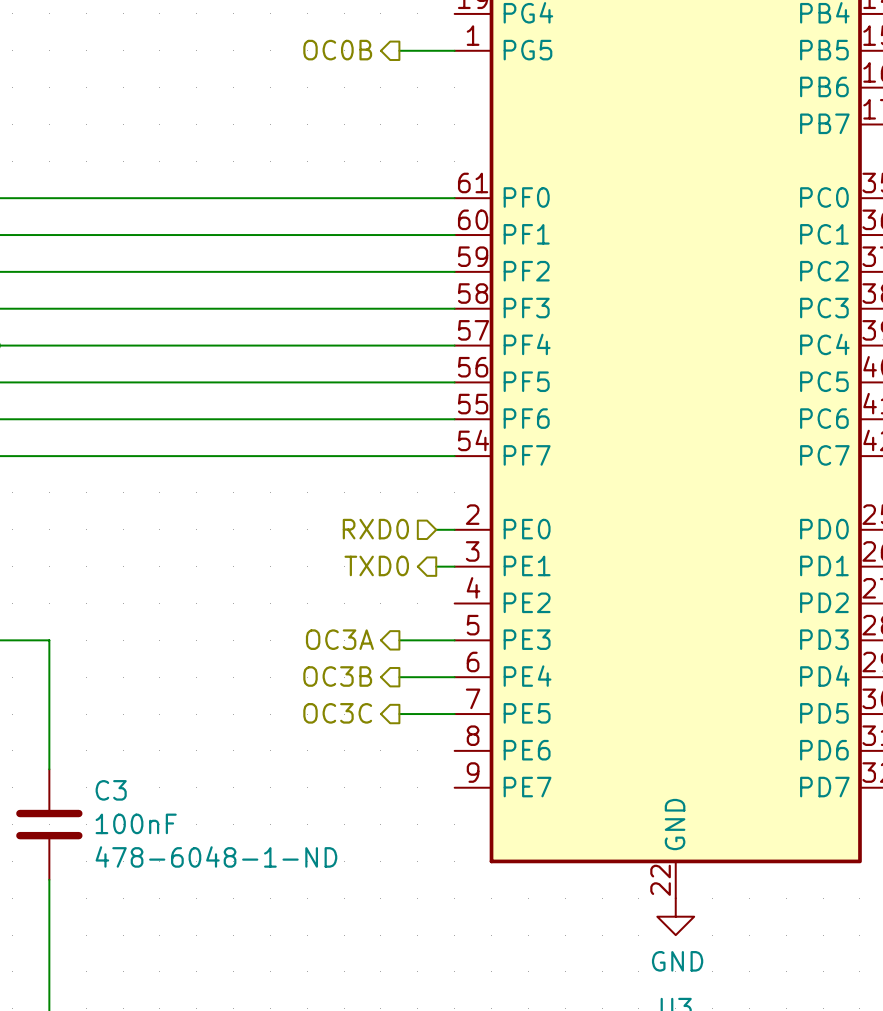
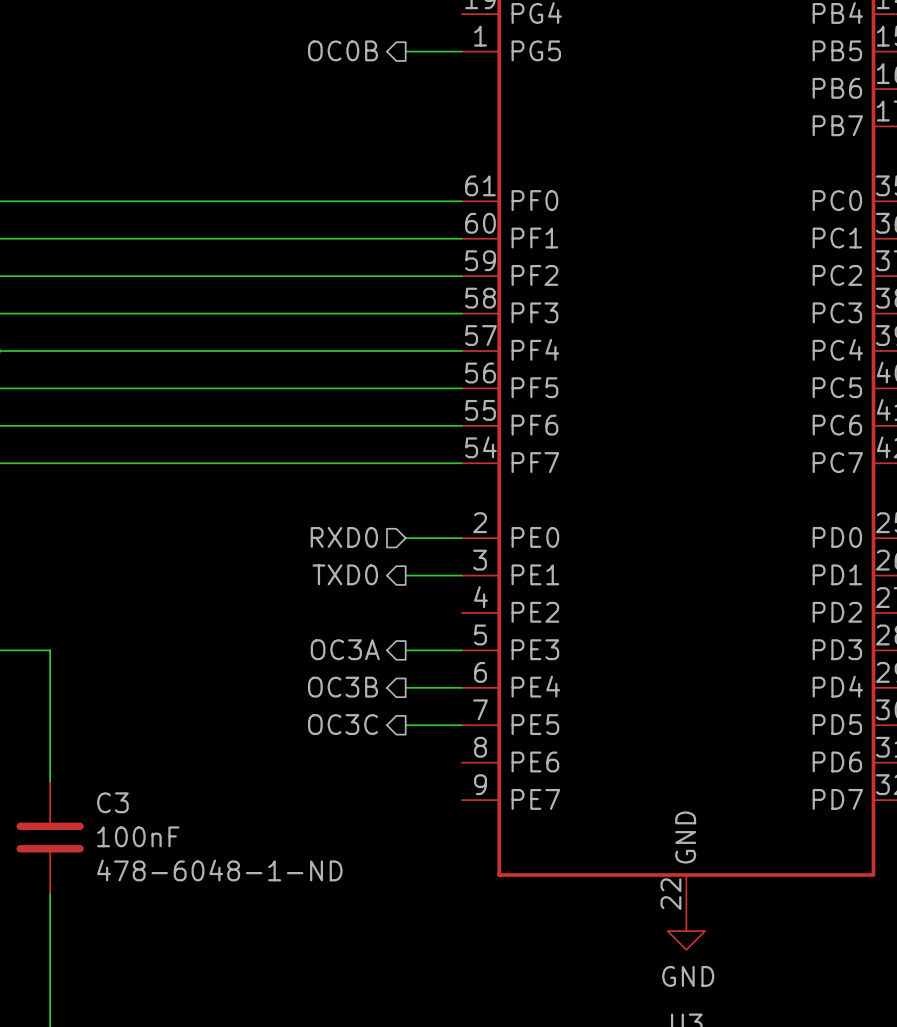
hierarchical label position: RXD0 (375, 529) -> RXD0 (344, 537)
wire: none -> (405, 538) (443, 538)
hierarchical label position: TXD0 (376, 565) -> TXD0 (345, 574)
wire: none -> (405, 575) (443, 575)

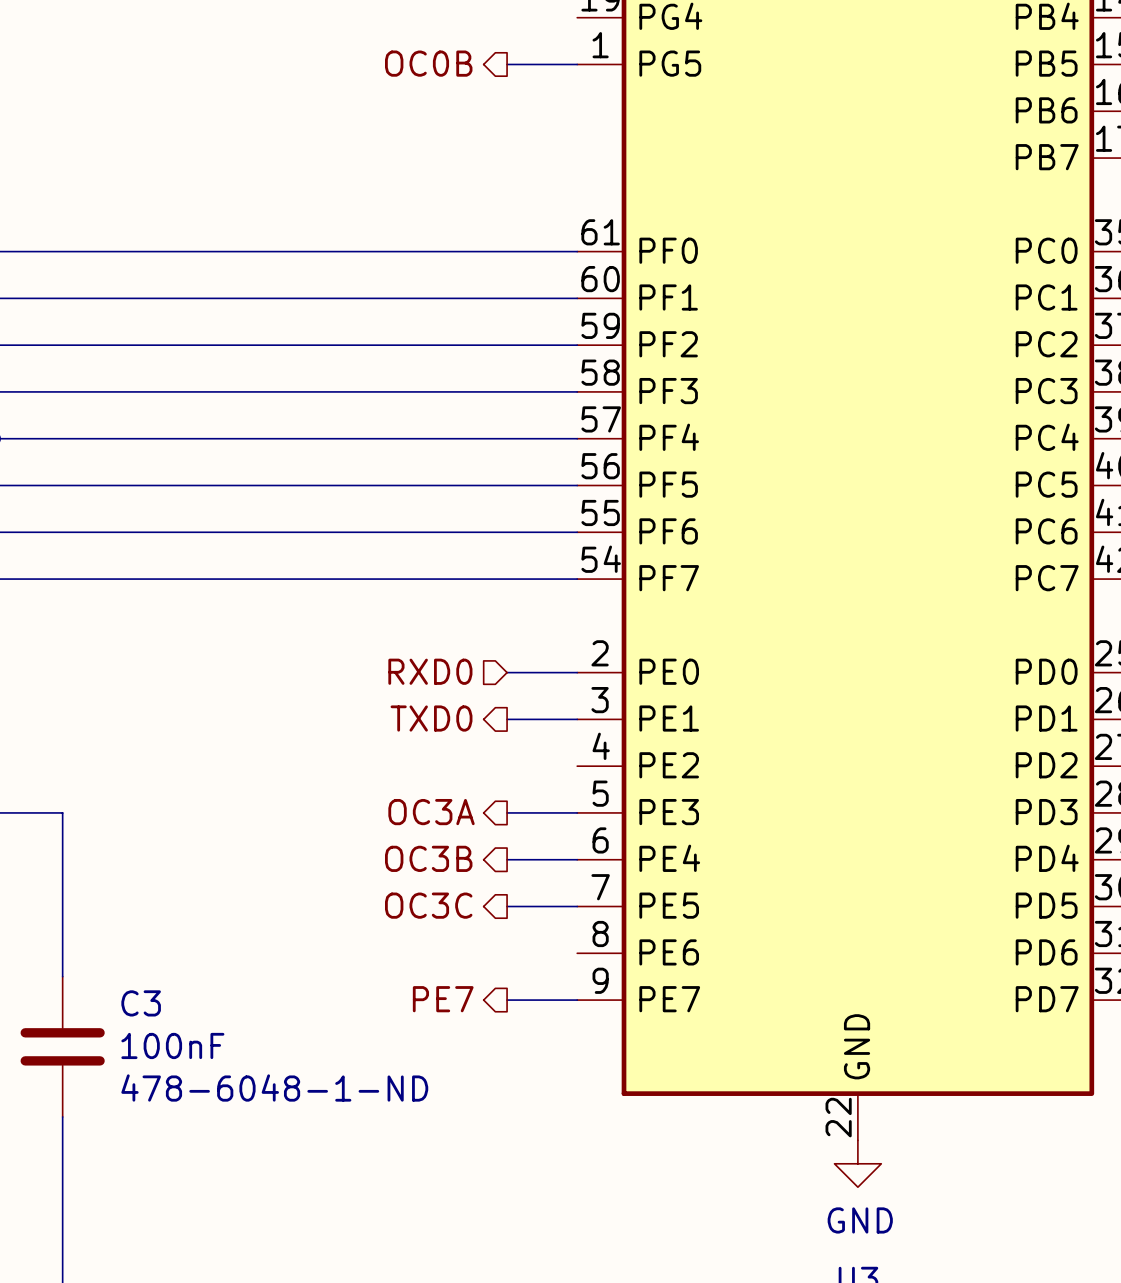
hierarchical label: none -> PE7 (443, 999)
wire: none -> (507, 1000) (577, 1000)

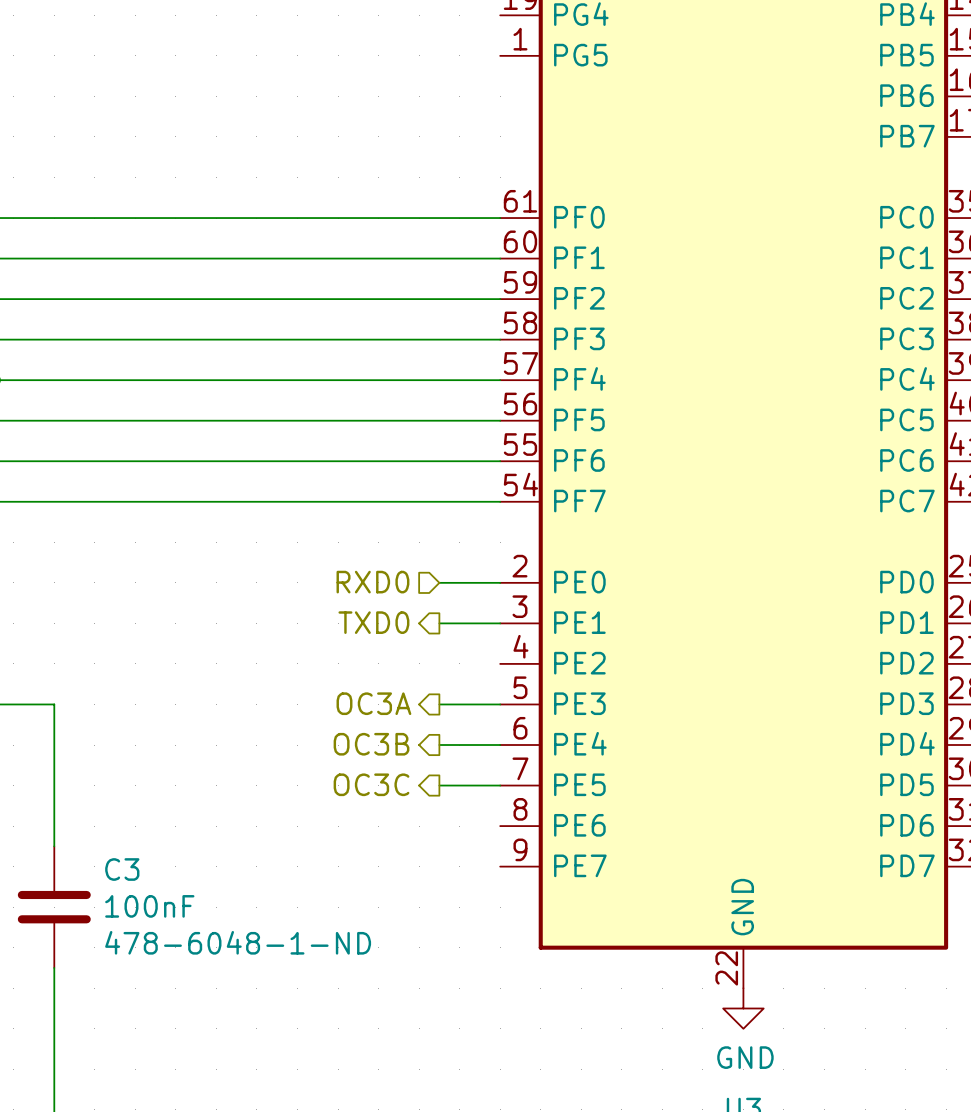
hierarchical label: OC0B (428, 63) -> none
wire: (507, 64) (577, 64) -> none
hierarchical label: PE7 (443, 999) -> none
wire: (507, 1000) (577, 1000) -> none

